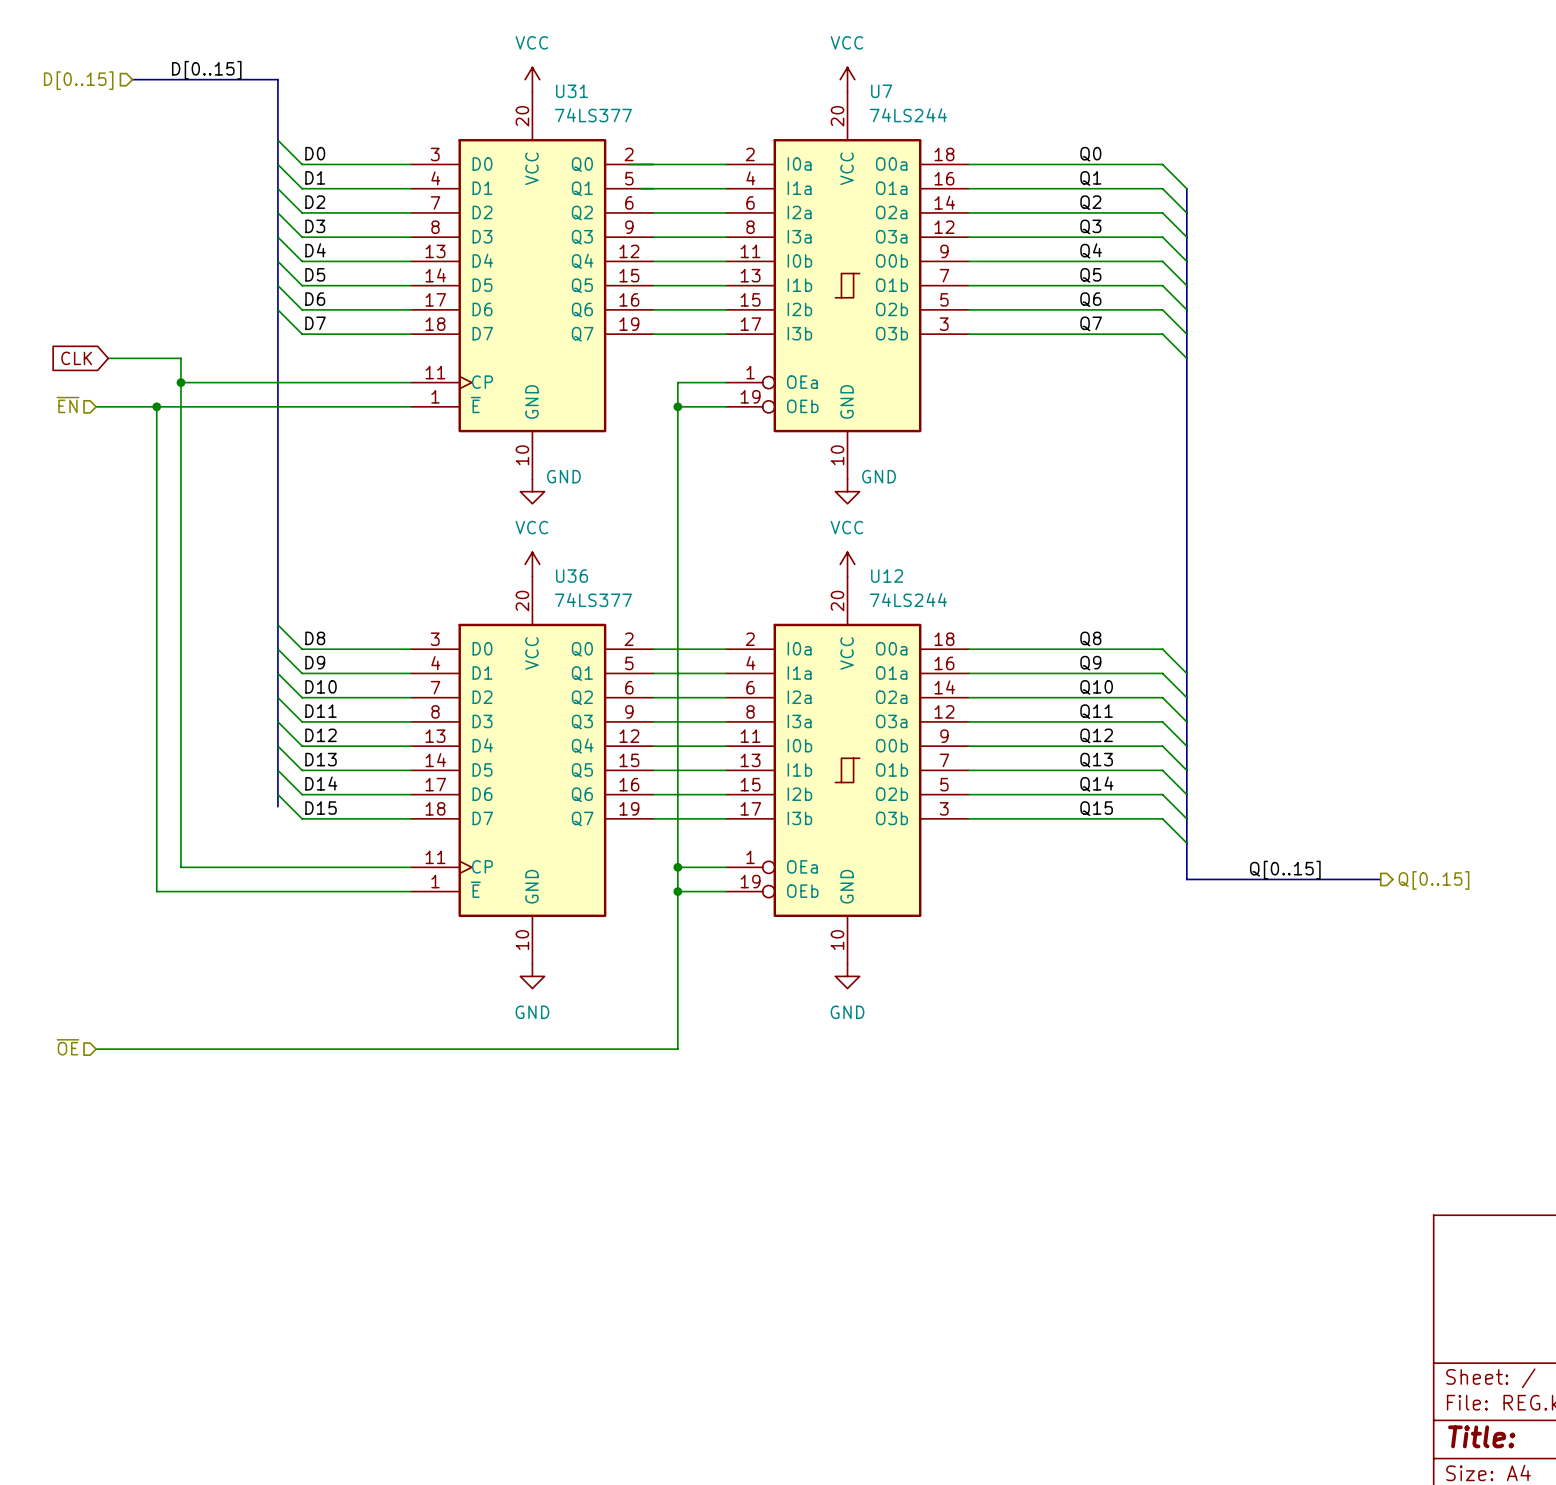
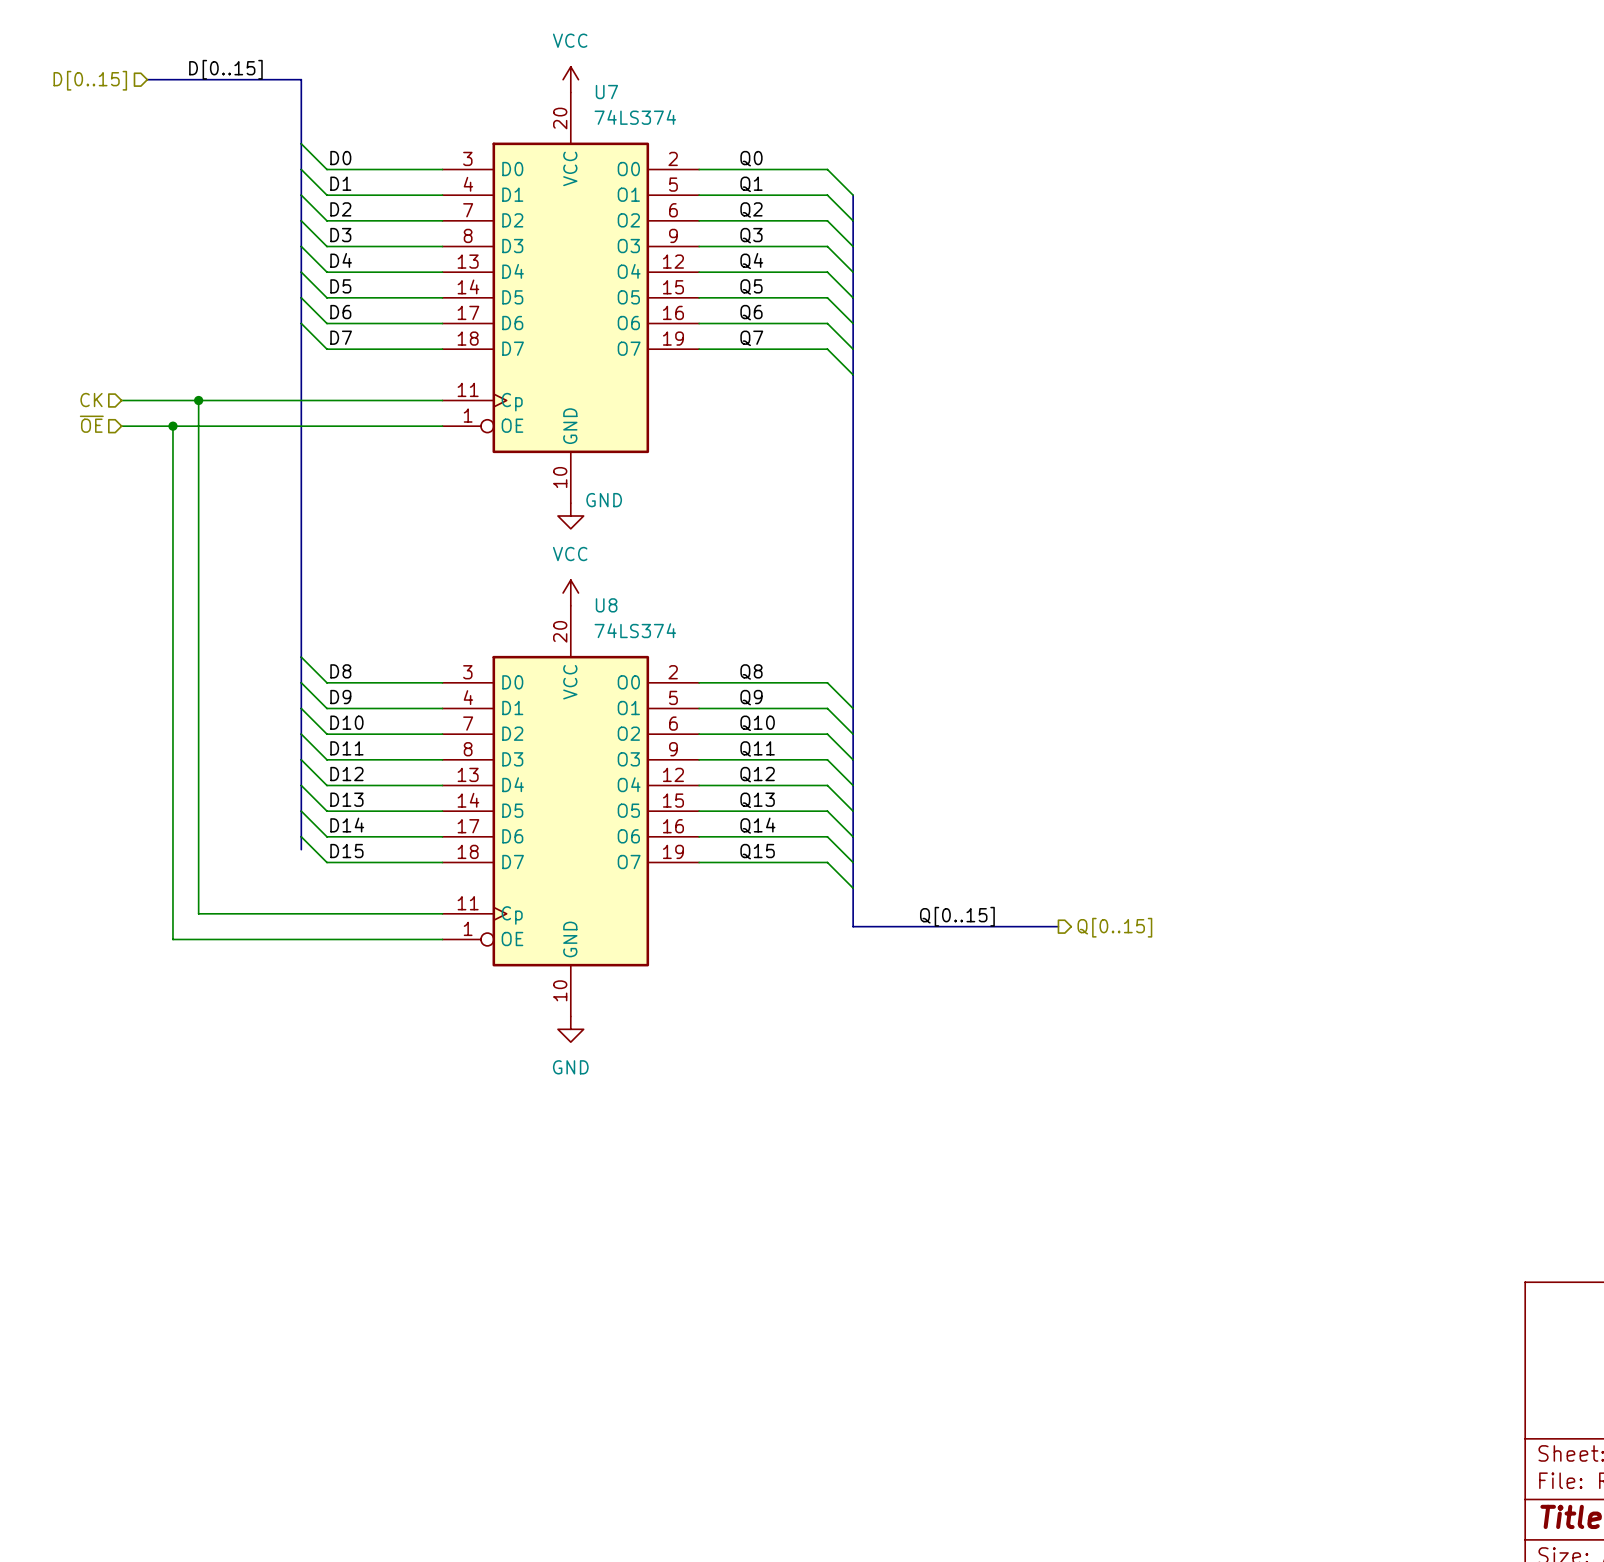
power symbol: VCC (847, 79) -> none
U7 symbol: [726, 91, 969, 480] -> [442, 92, 700, 504]
U7 value: 74LS244 (908, 115) -> 74LS374 (635, 117)
label: none -> Q0 (751, 158)
label: Q0 (1090, 154) -> none
wire: (968, 164) (1162, 164) (1186, 188) -> none
label: none -> Q1 (751, 184)
label: Q1 (1090, 178) -> none
bus: none -> (853, 195) (853, 926) (1058, 926)
wire: (968, 188) (1162, 188) (1186, 212) -> none
bus: (1186, 188) (1186, 879) (1380, 879) -> none
label: none -> Q2 (751, 210)
label: Q2 (1090, 202) -> none
wire: (968, 212) (1162, 212) (1186, 237) -> none
label: none -> Q3 (751, 235)
label: Q3 (1090, 226) -> none
wire: (968, 237) (1162, 237) (1186, 261) -> none
label: none -> Q4 (751, 261)
label: Q4 (1091, 250) -> none
wire: (968, 261) (1162, 261) (1186, 285) -> none
label: none -> Q5 (751, 287)
label: Q5 (1090, 275) -> none
U31: 74LS377 (532, 285) -> none
wire: (968, 285) (1162, 285) (1186, 309) -> none
label: none -> Q6 (751, 312)
label: Q6 (1090, 299) -> none
wire: (968, 309) (1162, 309) (1186, 334) -> none
label: none -> Q7 (751, 338)
label: Q7 (1091, 323) -> none
wire: (968, 334) (1162, 334) (1186, 358) -> none
global label: CLK (76, 358) -> none
wire: (108, 358) (180, 358) (180, 382) -> (121, 400) (198, 400)
hierarchical label: none -> CK (91, 400)
wire: (726, 382) (677, 382) (677, 1049) (96, 1049) -> none
hierarchical label: ~{EN} (67, 404) -> ~{OE} (91, 424)
wire: (96, 406) (108, 406) -> none
wire: (677, 406) (726, 406) -> none
junction: (677, 406) -> none
power symbol: GND (847, 491) -> none
power symbol: VCC (847, 564) -> none
label: none -> Q8 (751, 671)
label: Q8 (1090, 638) -> none
wire: (968, 649) (1162, 649) (1186, 673) -> none
label: none -> Q9 (751, 697)
label: Q9 (1090, 663) -> none
wire: (968, 673) (1162, 673) (1186, 697) -> none
label: none -> Q10 (757, 723)
label: Q10 (1096, 687) -> none
wire: (968, 697) (1162, 697) (1186, 721) -> none
label: none -> Q11 (757, 748)
label: Q11 (1096, 711) -> none
wire: (968, 721) (1162, 721) (1186, 746) -> none
label: none -> Q12 (757, 774)
label: Q12 (1096, 735) -> none
wire: (968, 746) (1162, 746) (1186, 770) -> none
label: none -> Q13 (757, 800)
label: Q13 (1096, 760) -> none
U36: 74LS377 (532, 770) -> none
U8: none -> 74LS374 (570, 811)
U12: 74LS244 (847, 770) -> none
wire: (968, 770) (1162, 770) (1186, 794) -> none
label: none -> Q14 (757, 825)
label: Q14 (1096, 784) -> none
wire: (968, 794) (1162, 794) (1186, 818) -> none
label: none -> Q15 (757, 851)
label: Q15 (1096, 808) -> none
wire: (968, 818) (1162, 818) (1186, 843) -> none
wire: (677, 867) (726, 867) -> none
junction: (677, 867) -> none
label: none -> Q[0..15] (957, 916)
label: Q[0..15] (1285, 870) -> none
hierarchical label: none -> Q[0..15] (1114, 927)
hierarchical label: Q[0..15] (1434, 880) -> none
wire: (677, 891) (726, 891) -> none
junction: (677, 891) -> none
power symbol: GND (847, 976) -> none
hierarchical label: ~{OE} (67, 1047) -> none

